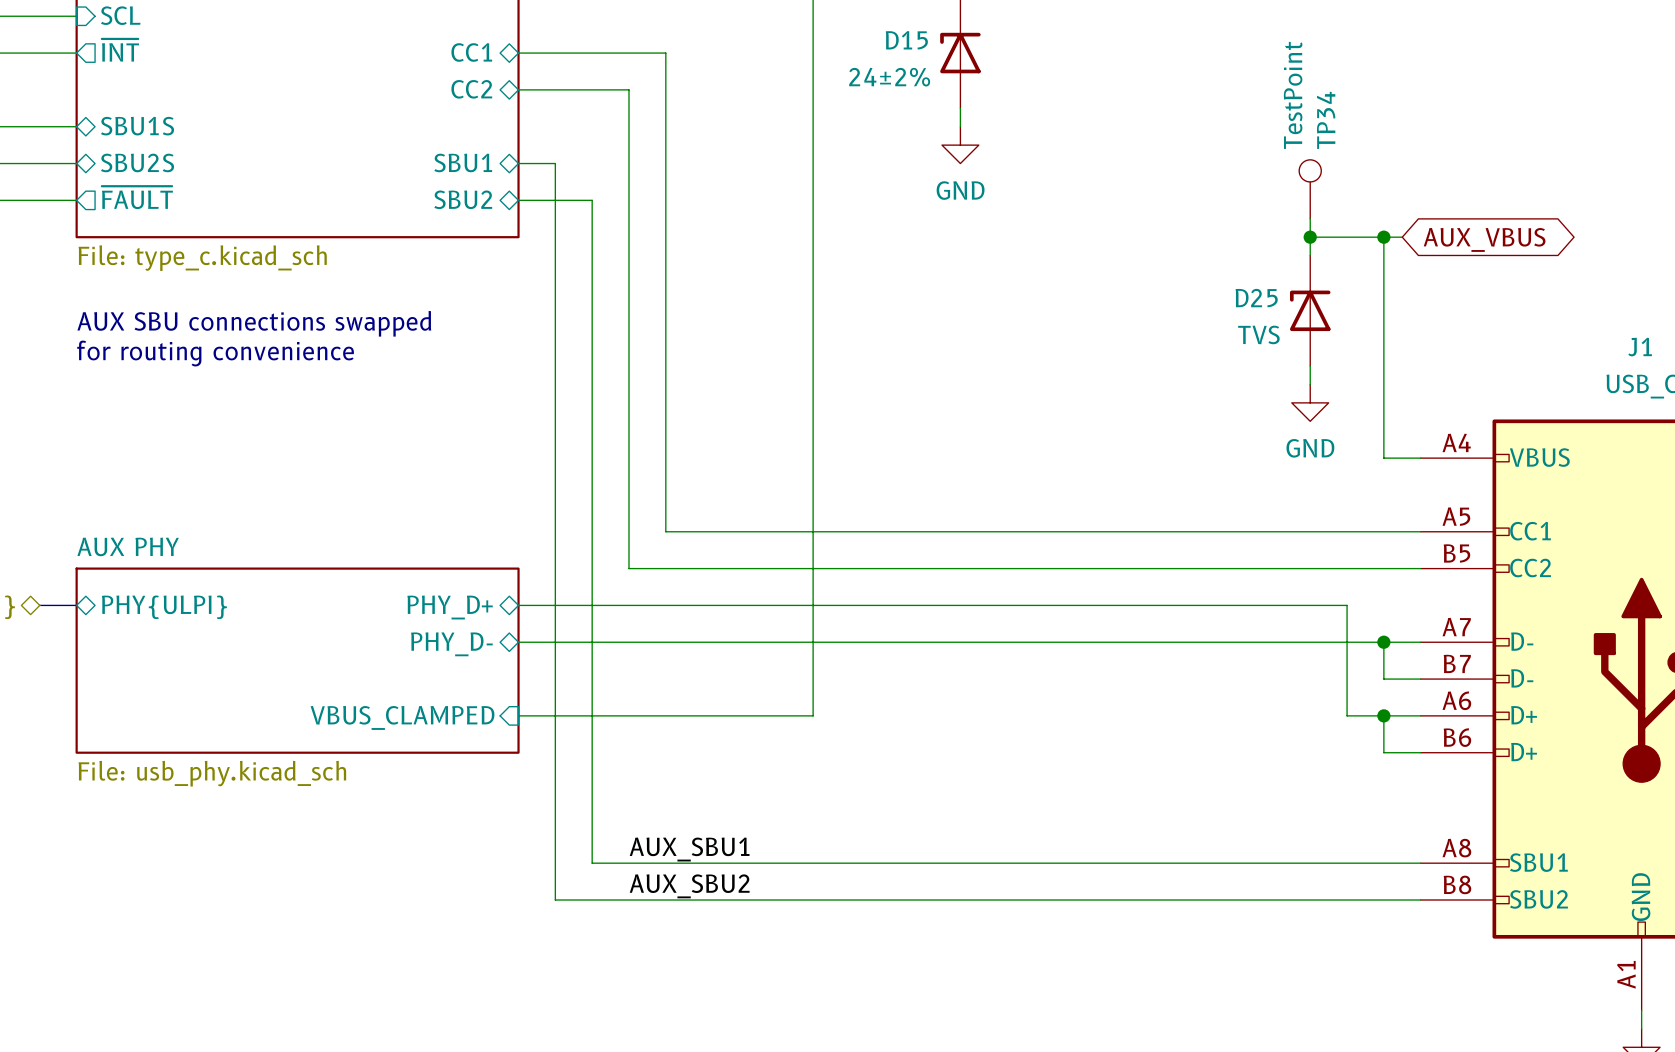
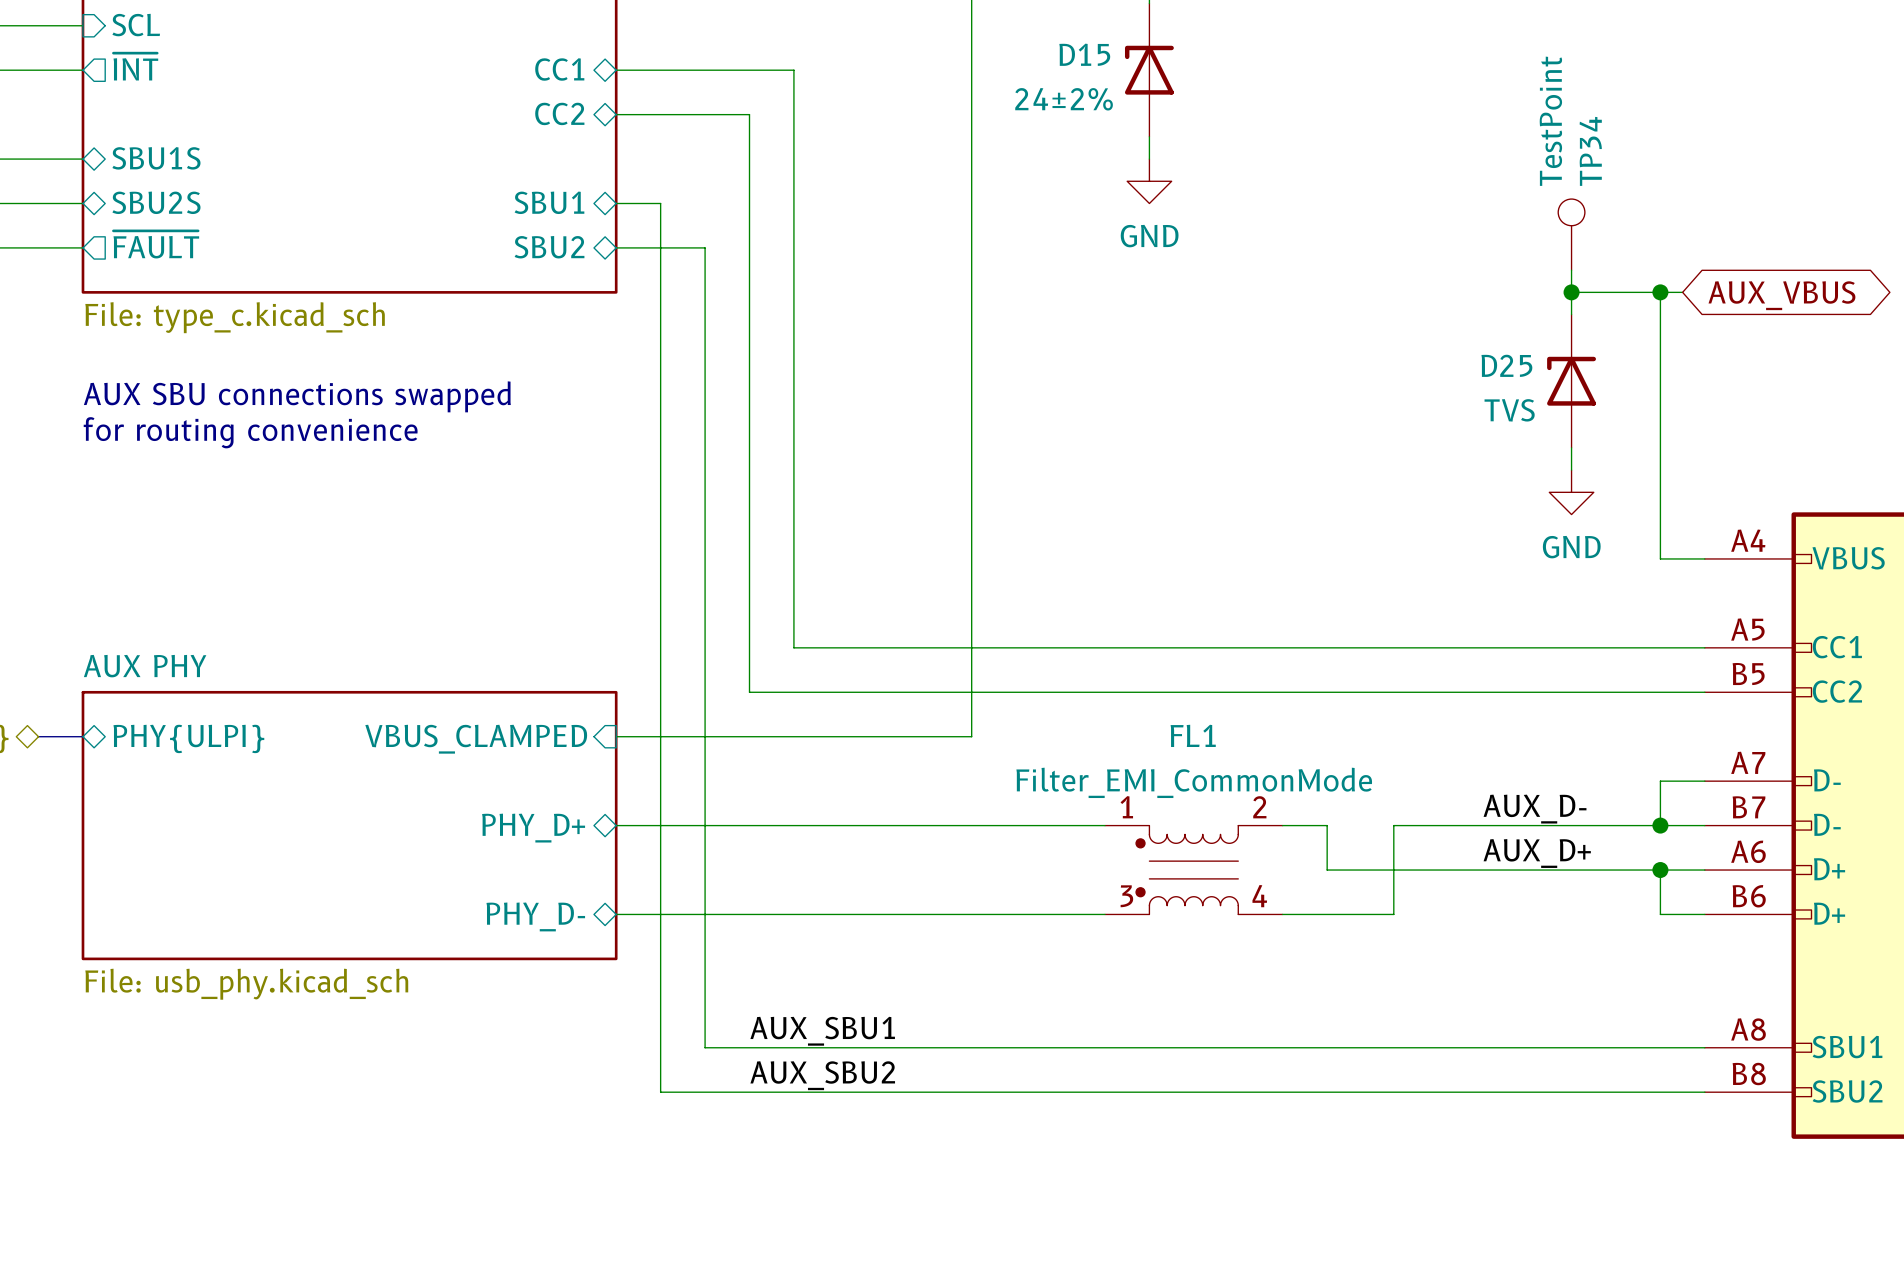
sheet pin shape: bidirectional (450, 607) -> input (476, 739)
sheet pin: PHY_D+ (450, 607) -> VBUS_CLAMPED (476, 739)
wire: (518, 642) (1383, 642) -> none
junction position: (1383, 642) -> (1660, 825)
sheet pin position: PHY_D- (451, 644) -> PHY_D- (535, 916)
sheet AUX PHY: File: usb_phy.kicad_sch (297, 660) -> none
label: none -> AUX_D- (1535, 809)
sheet AUX PHY: none -> File: usb_phy.kicad_sch (349, 825)
wire: none -> (616, 825) (1104, 825)
wire: none -> (1660, 825) (1393, 825) (1393, 914) (1282, 914)
sheet pin: none -> PHY_D+ (533, 828)
label: none -> AUX_D+ (1537, 853)
wire: (518, 715) (813, 715) (813, 605) (1347, 605) (1347, 715) -> (1282, 825) (1327, 825) (1327, 870) (1615, 870)
FL1: none -> Filter_EMI_CommonMode (1193, 870)
sheet pin: VBUS_CLAMPED (402, 717) -> none
wire: none -> (616, 914) (1104, 914)

